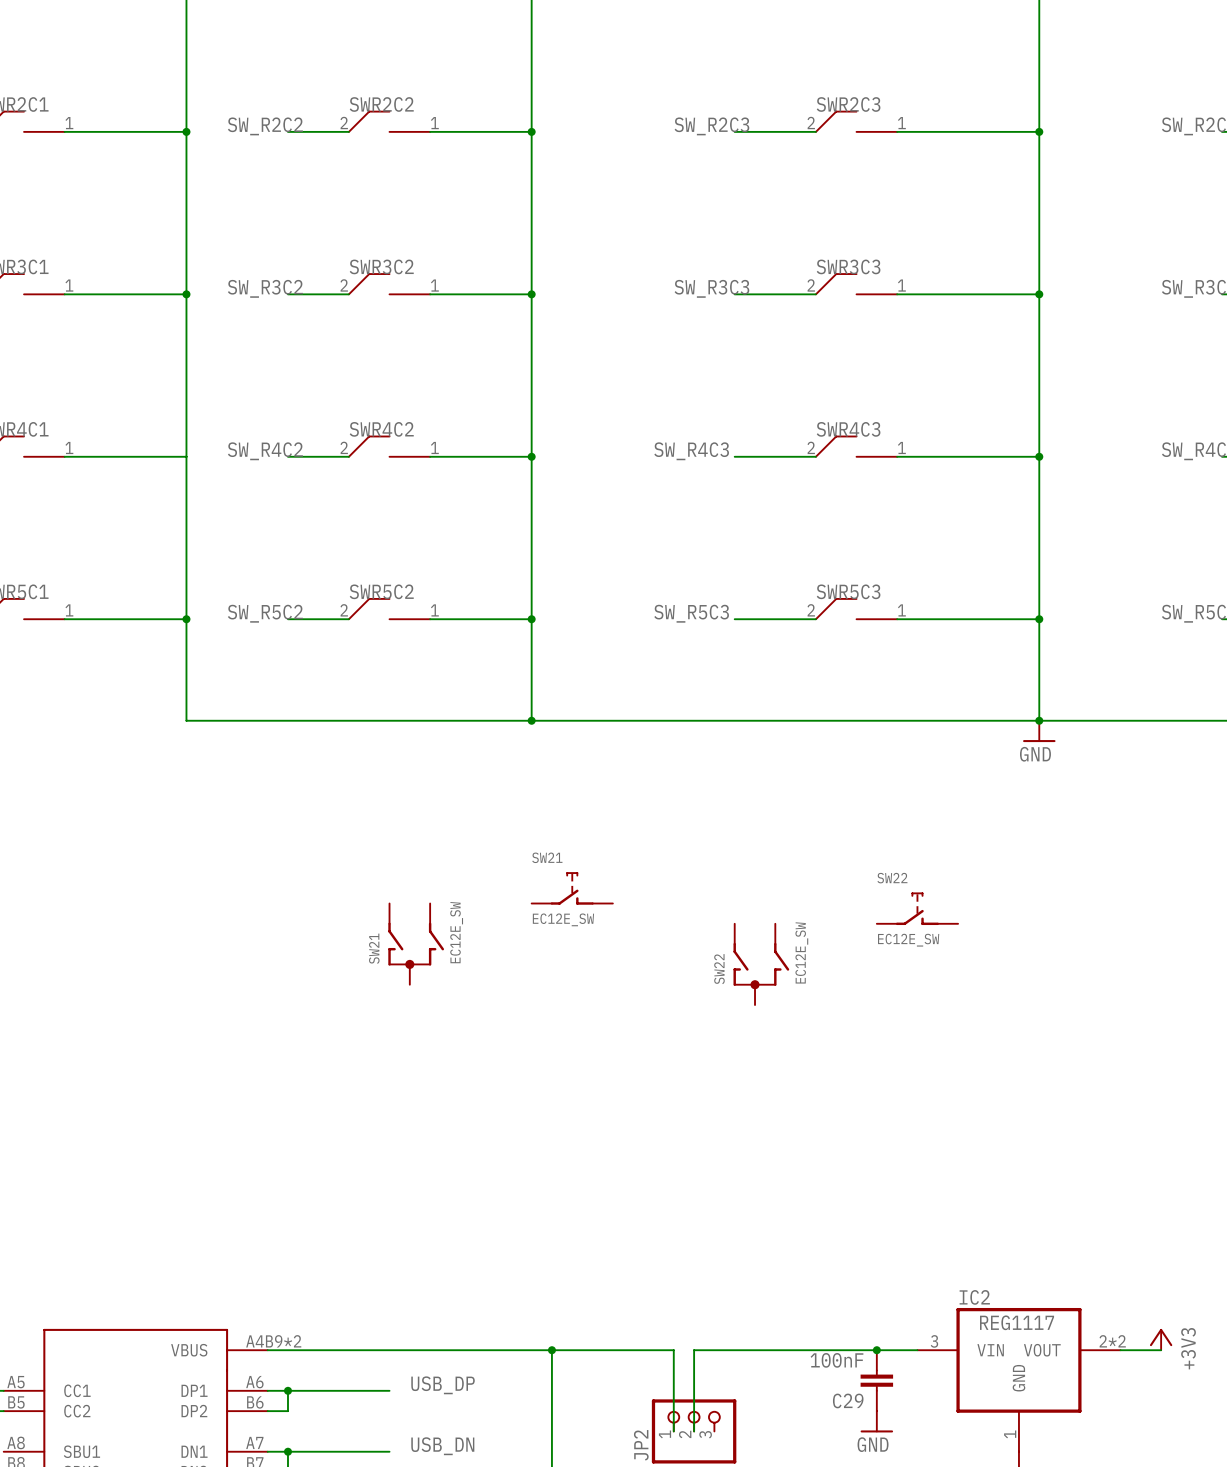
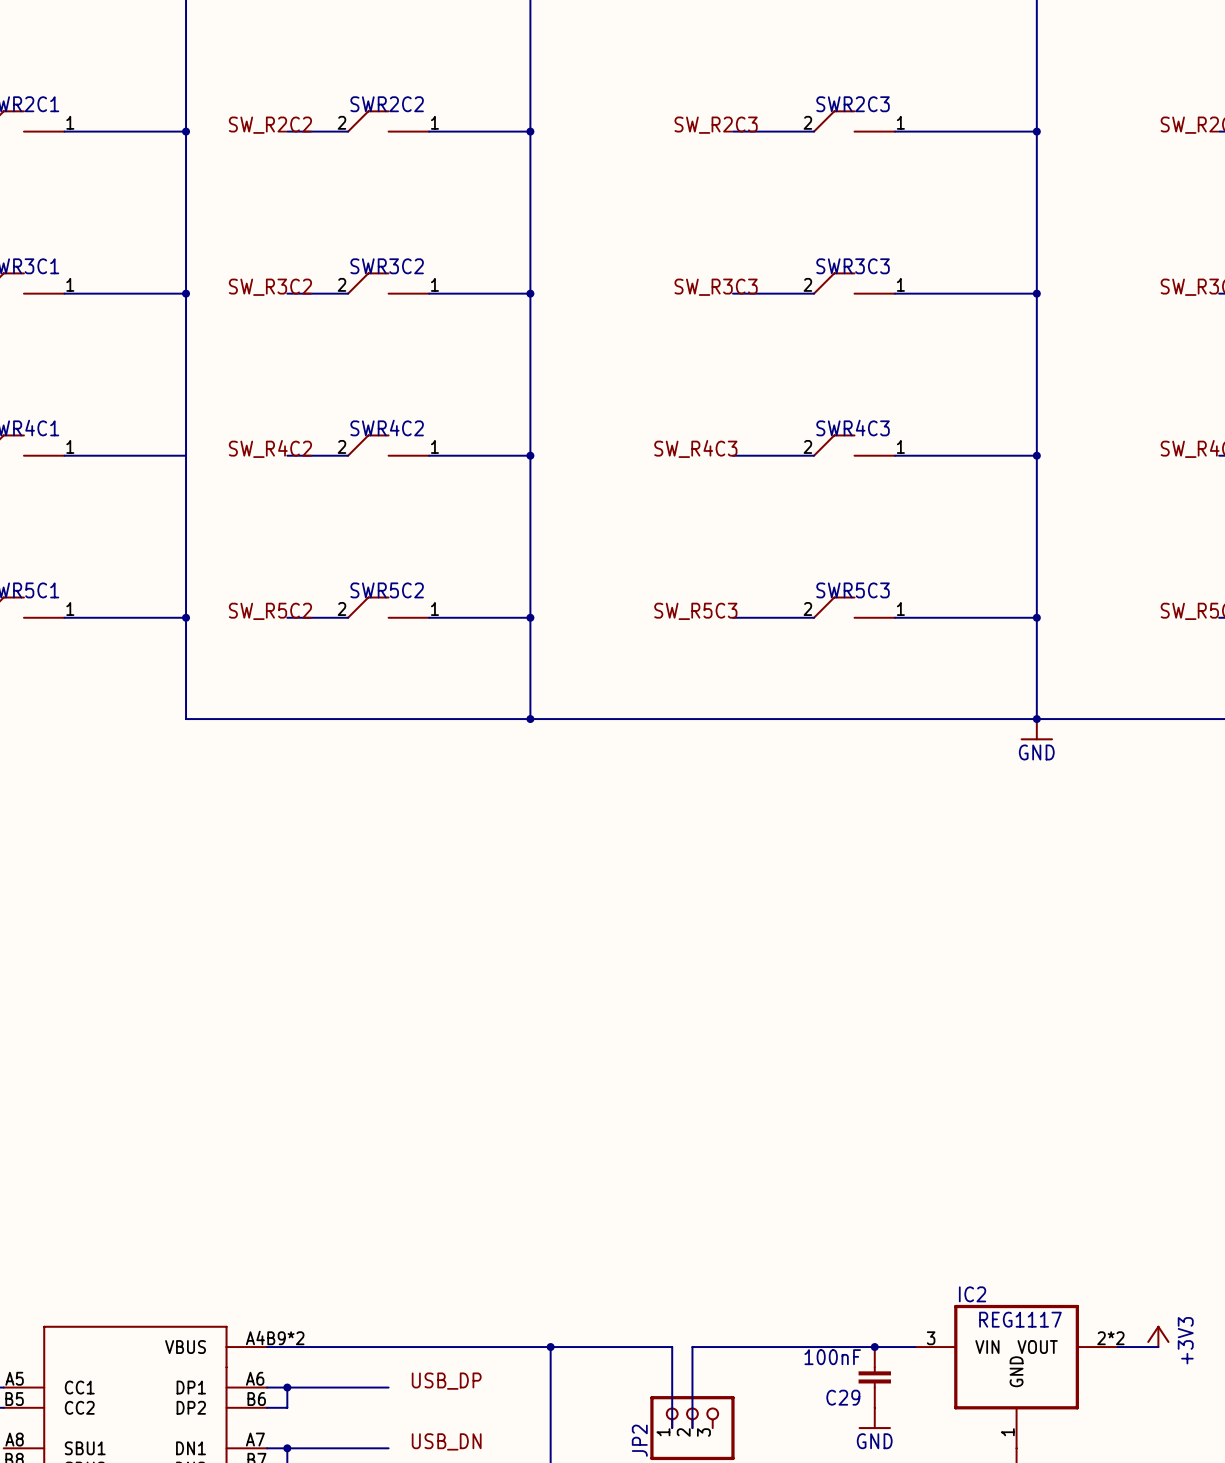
SW21: EC12E_SW (572, 888) -> none
SW22: EC12E_SW (917, 908) -> none
SW21: EC12E_SW (416, 944) -> none
SW22: EC12E_SW (761, 964) -> none

